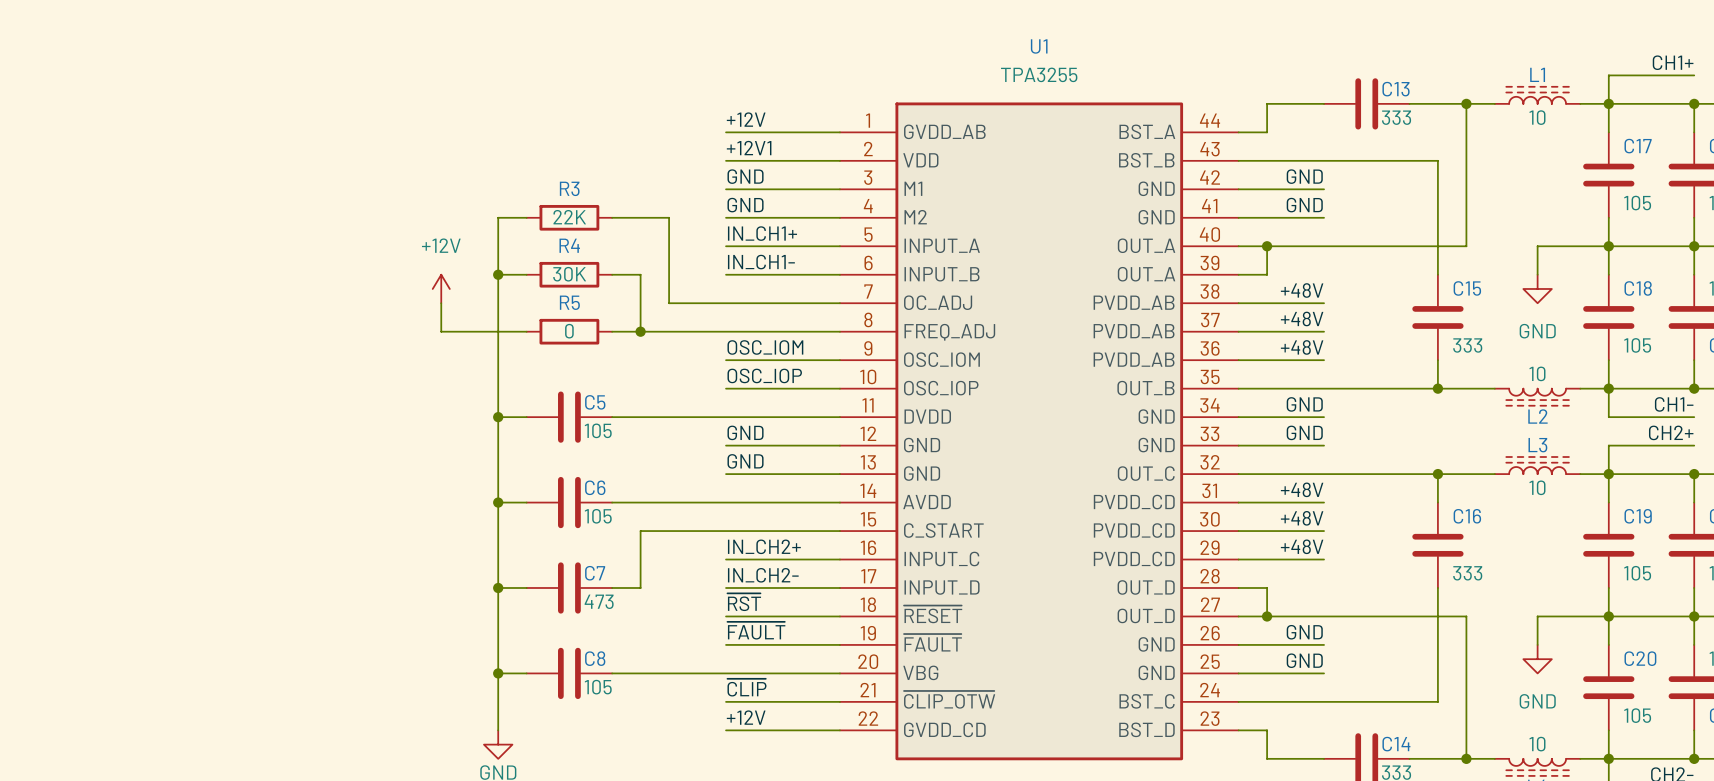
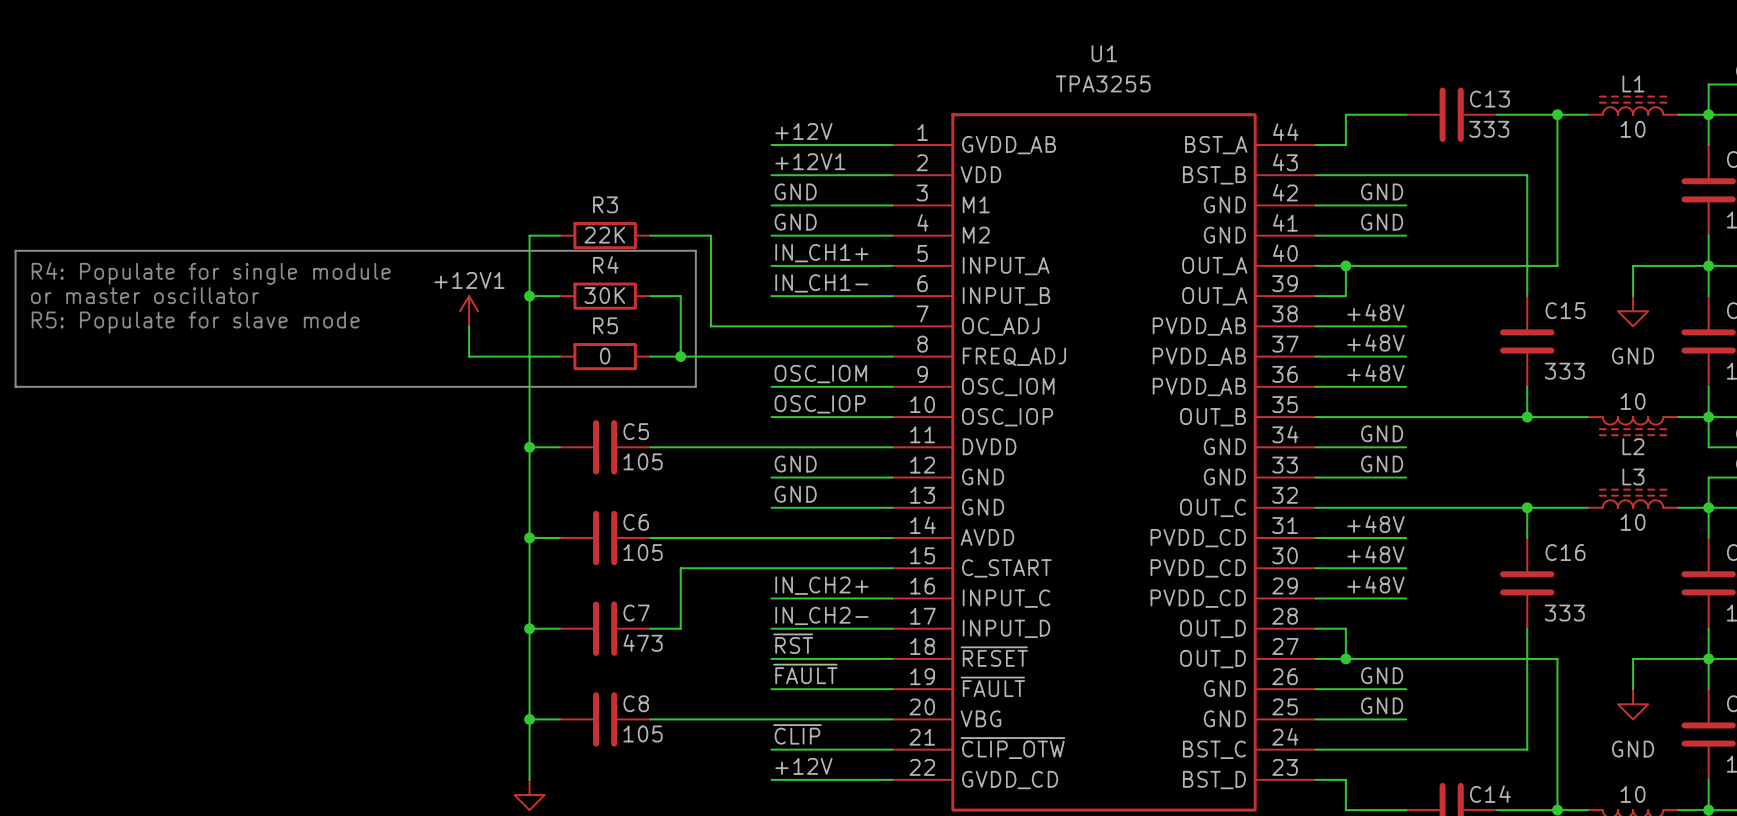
line: none -> (15, 250) (695, 250) (695, 386) (15, 386) (15, 250)
text: none -> R4: Populate for single module (211, 273)
text: none -> or master oscillator (144, 295)
power symbol: +12V (441, 288) -> +12V1 (469, 311)
text: none -> R5: Populate for slave mode (195, 322)

